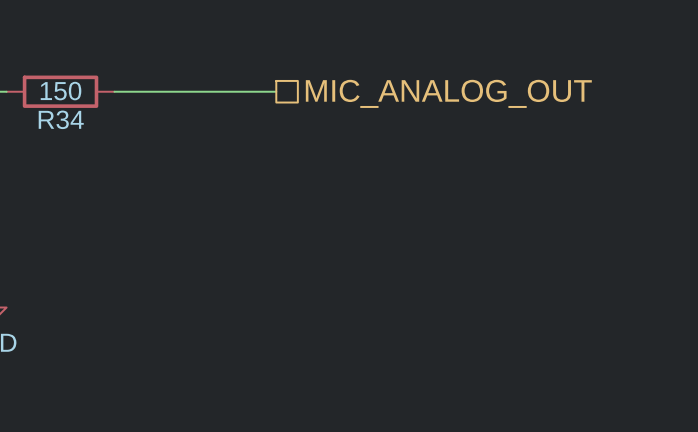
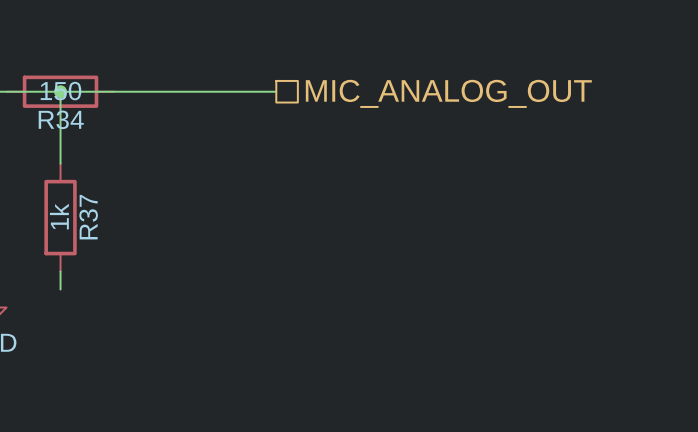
wire: none -> (6, 91) (114, 91)
wire: none -> (60, 91) (60, 163)
junction: none -> (60, 91)
R37: none -> 1k (60, 217)
wire: none -> (60, 271) (60, 289)

